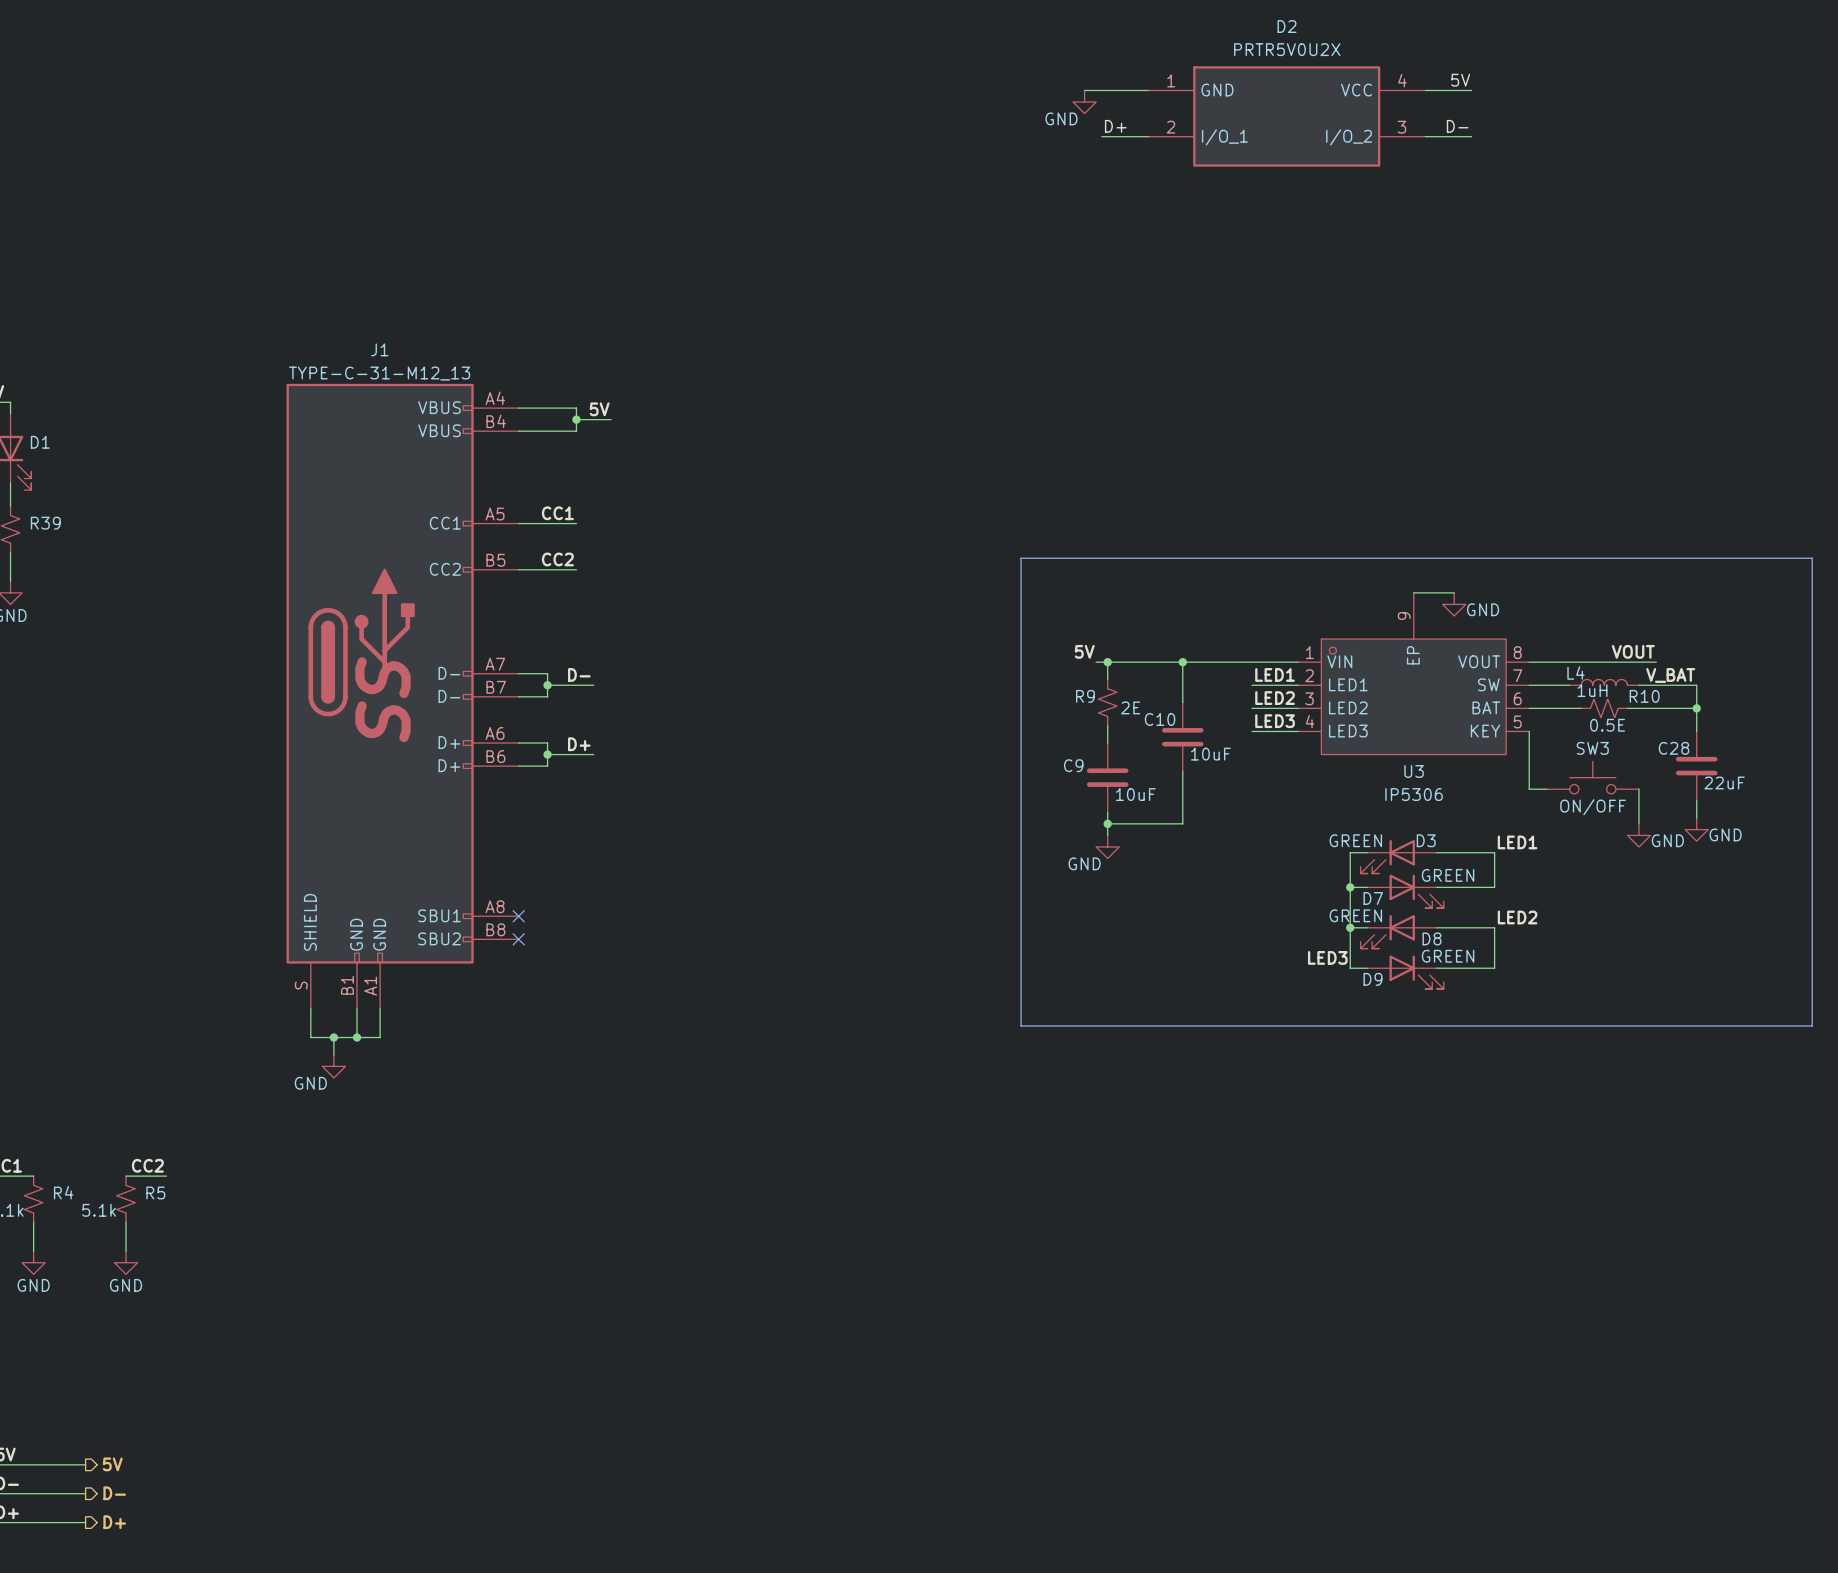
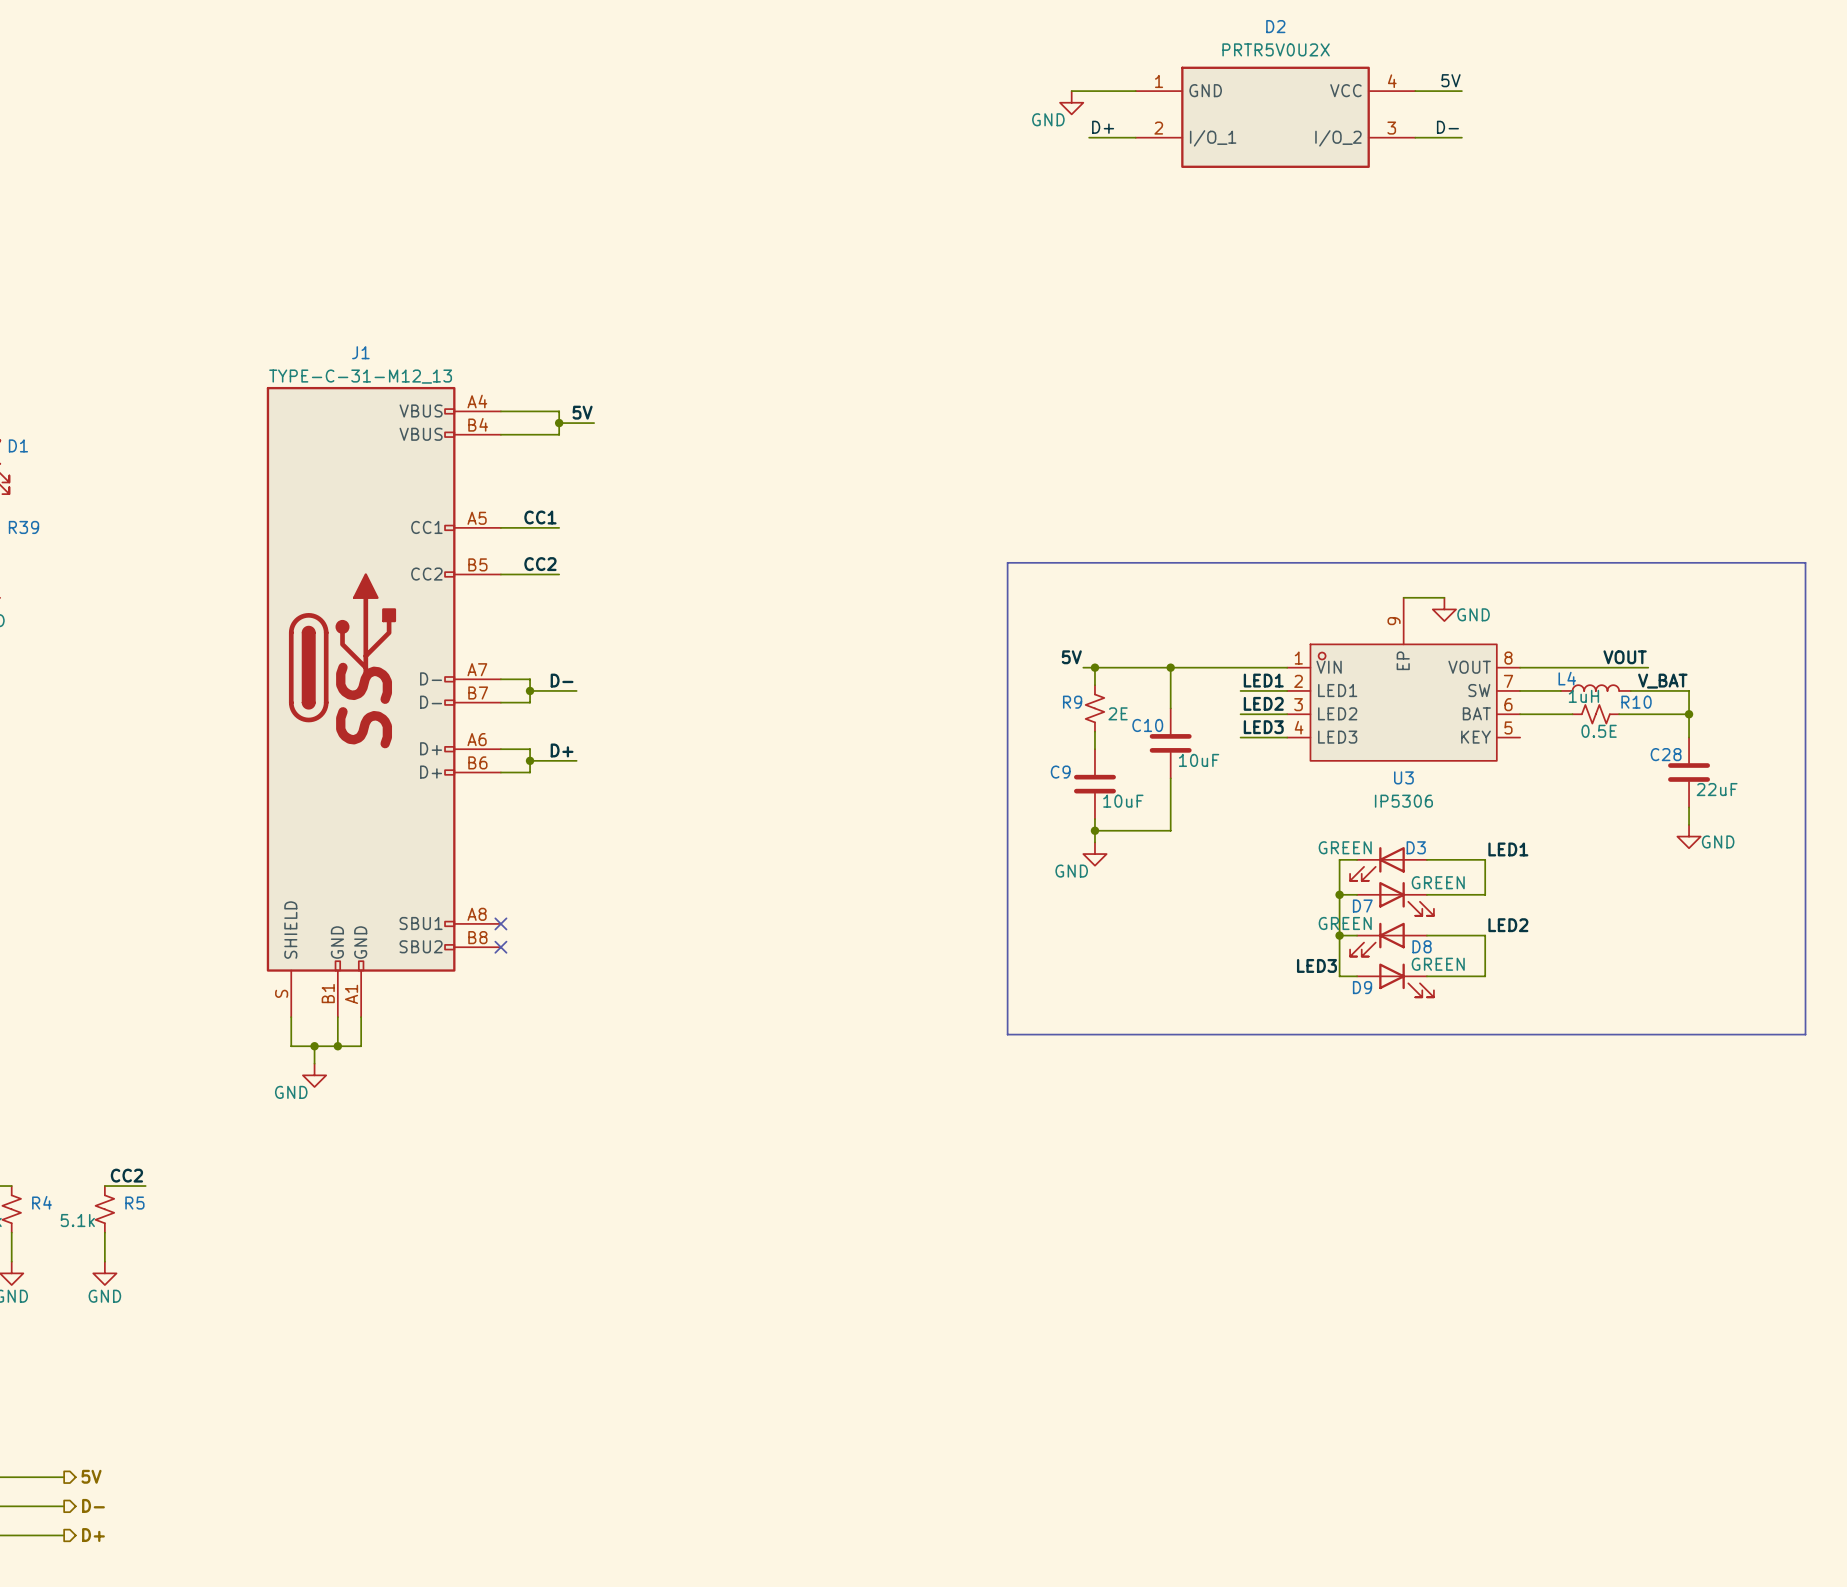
wire: (1529, 731) (1529, 789) (1546, 789) -> none
SW3: ON/OFF (1592, 777) -> none
wire: (1638, 789) (1638, 823) -> none
power symbol: GND (1638, 835) -> none

